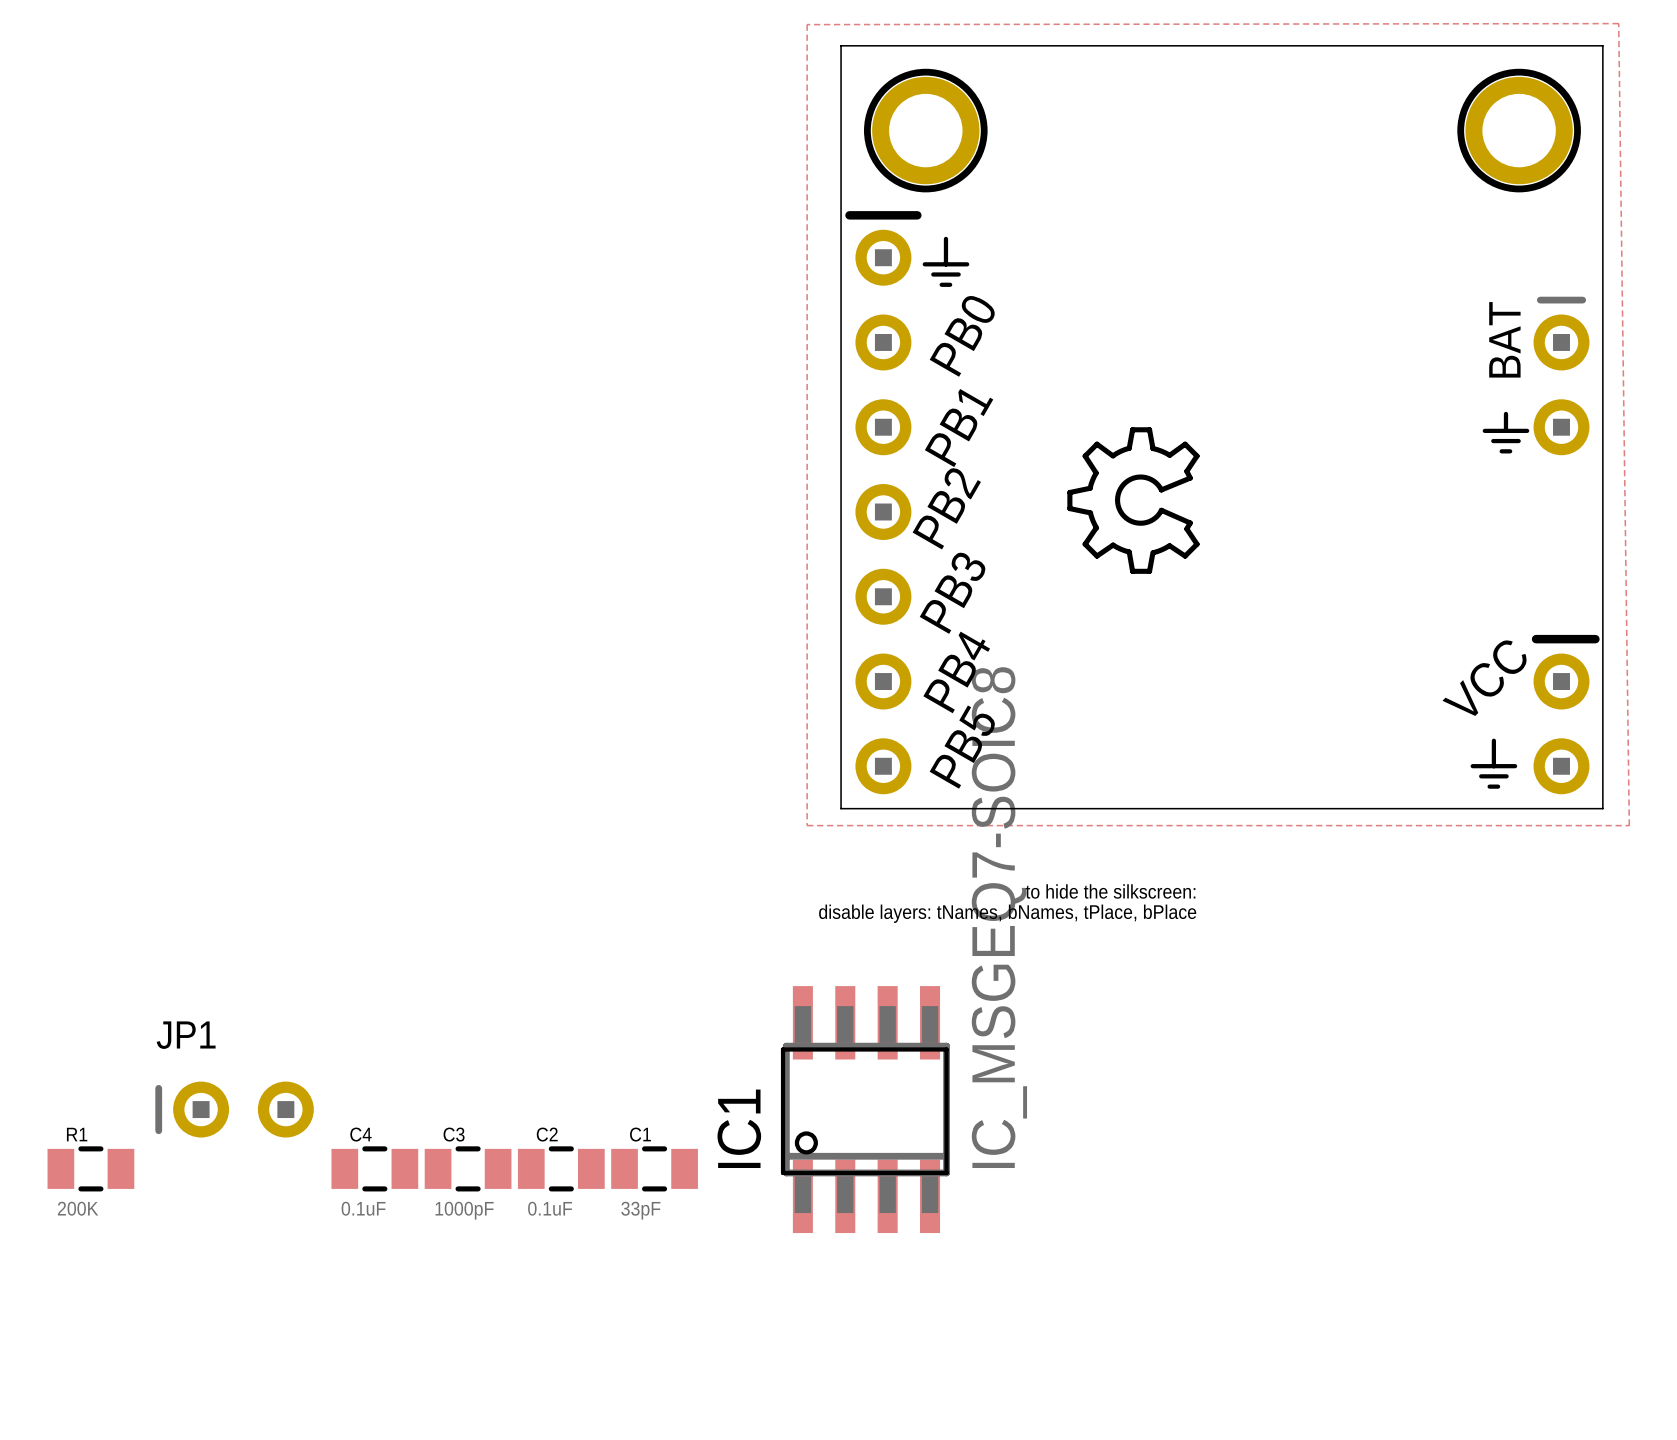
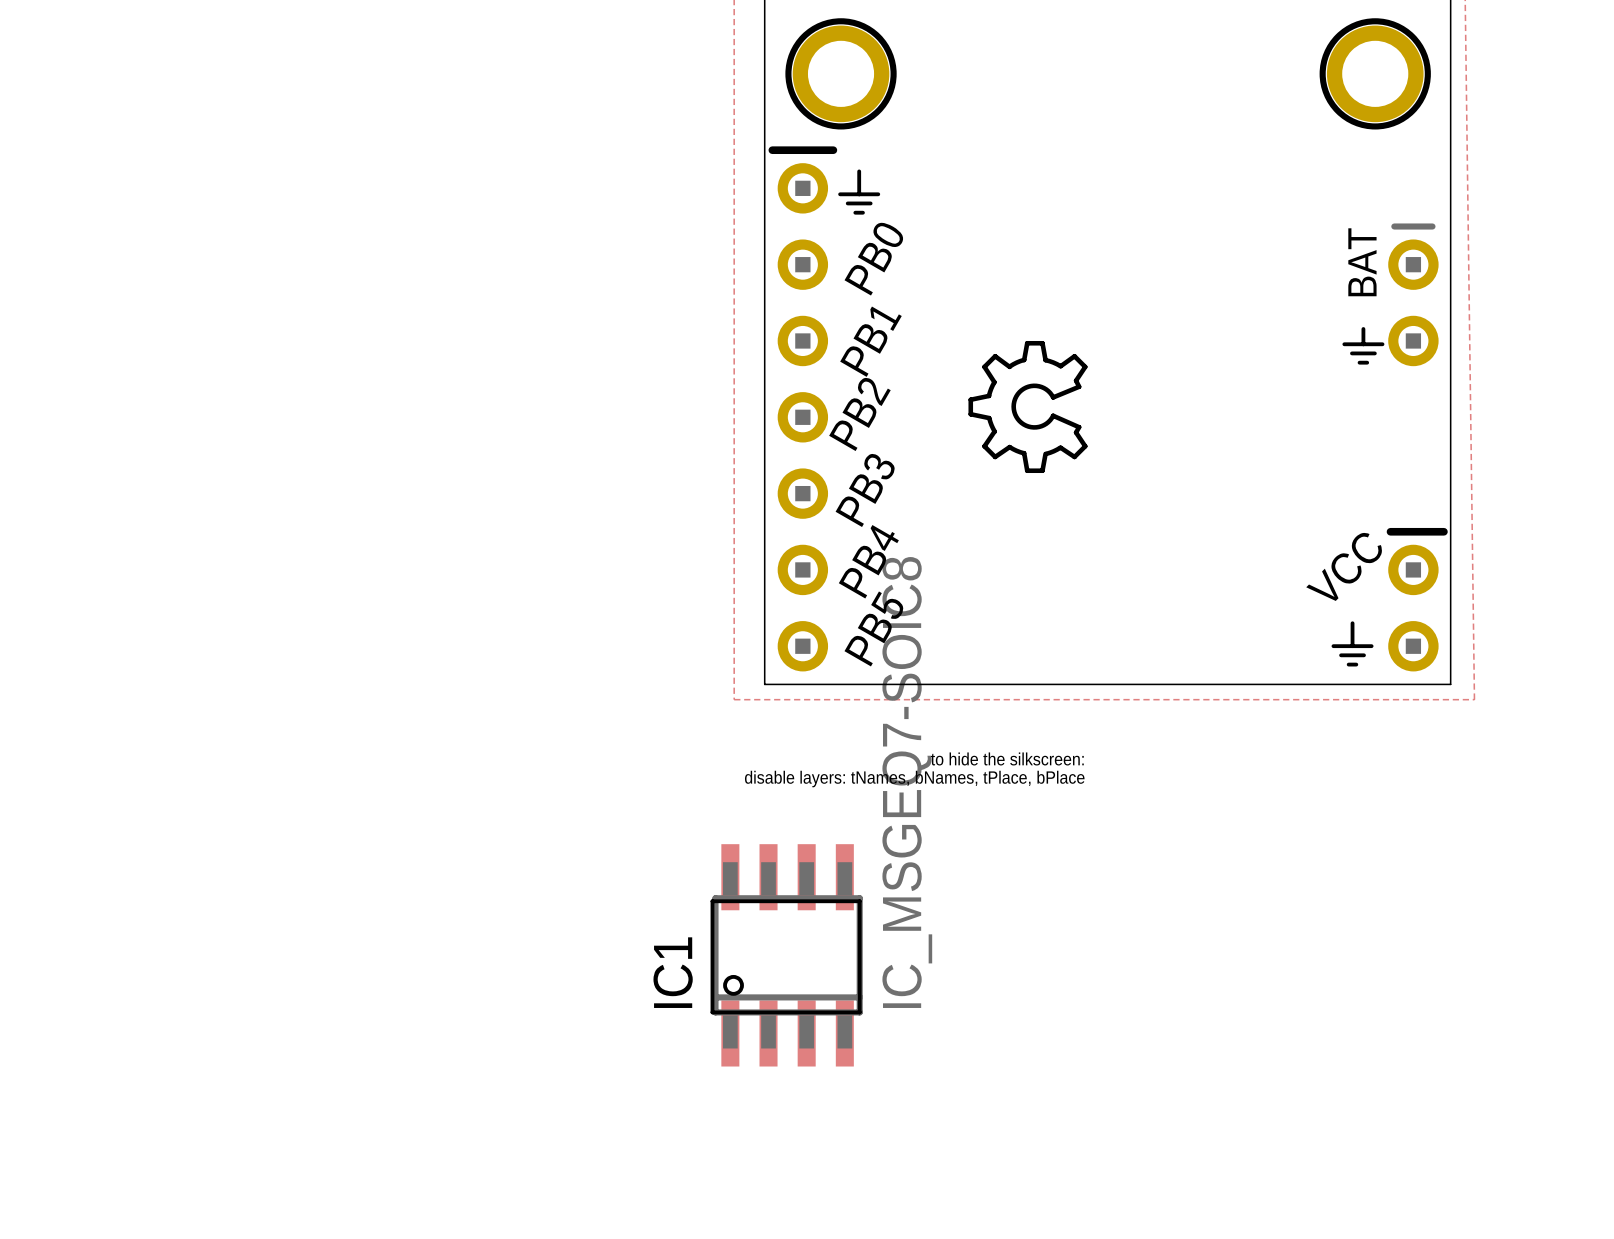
JP1: (234, 1109) -> none
R1: 200K (90, 1168) -> none
C4: 0.1uF (374, 1168) -> none
C3: 1000pF (468, 1168) -> none
C2: 0.1uF (561, 1168) -> none
C1: 33pF (654, 1168) -> none

